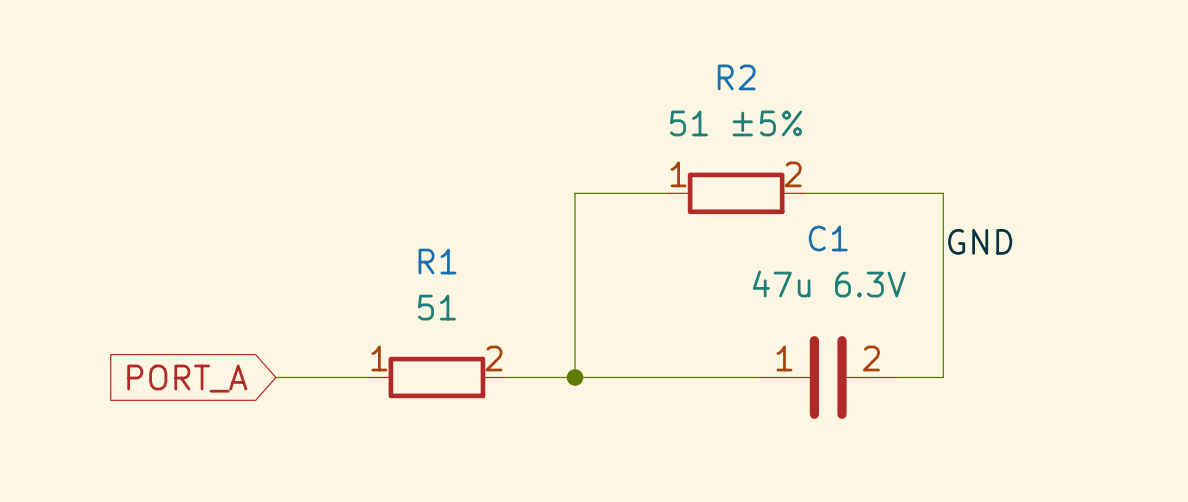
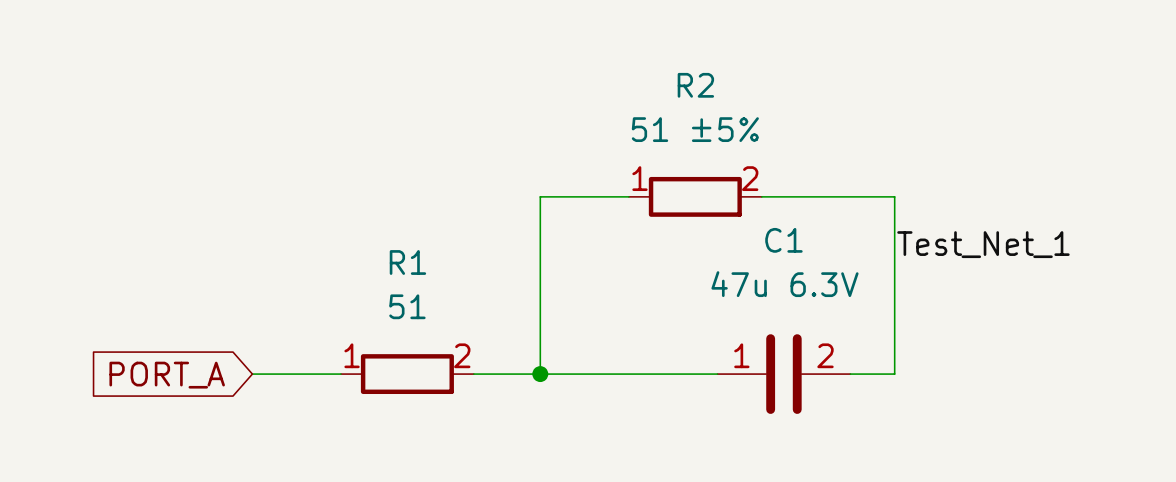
label: GND (980, 241) -> Test_Net_1 (983, 244)

